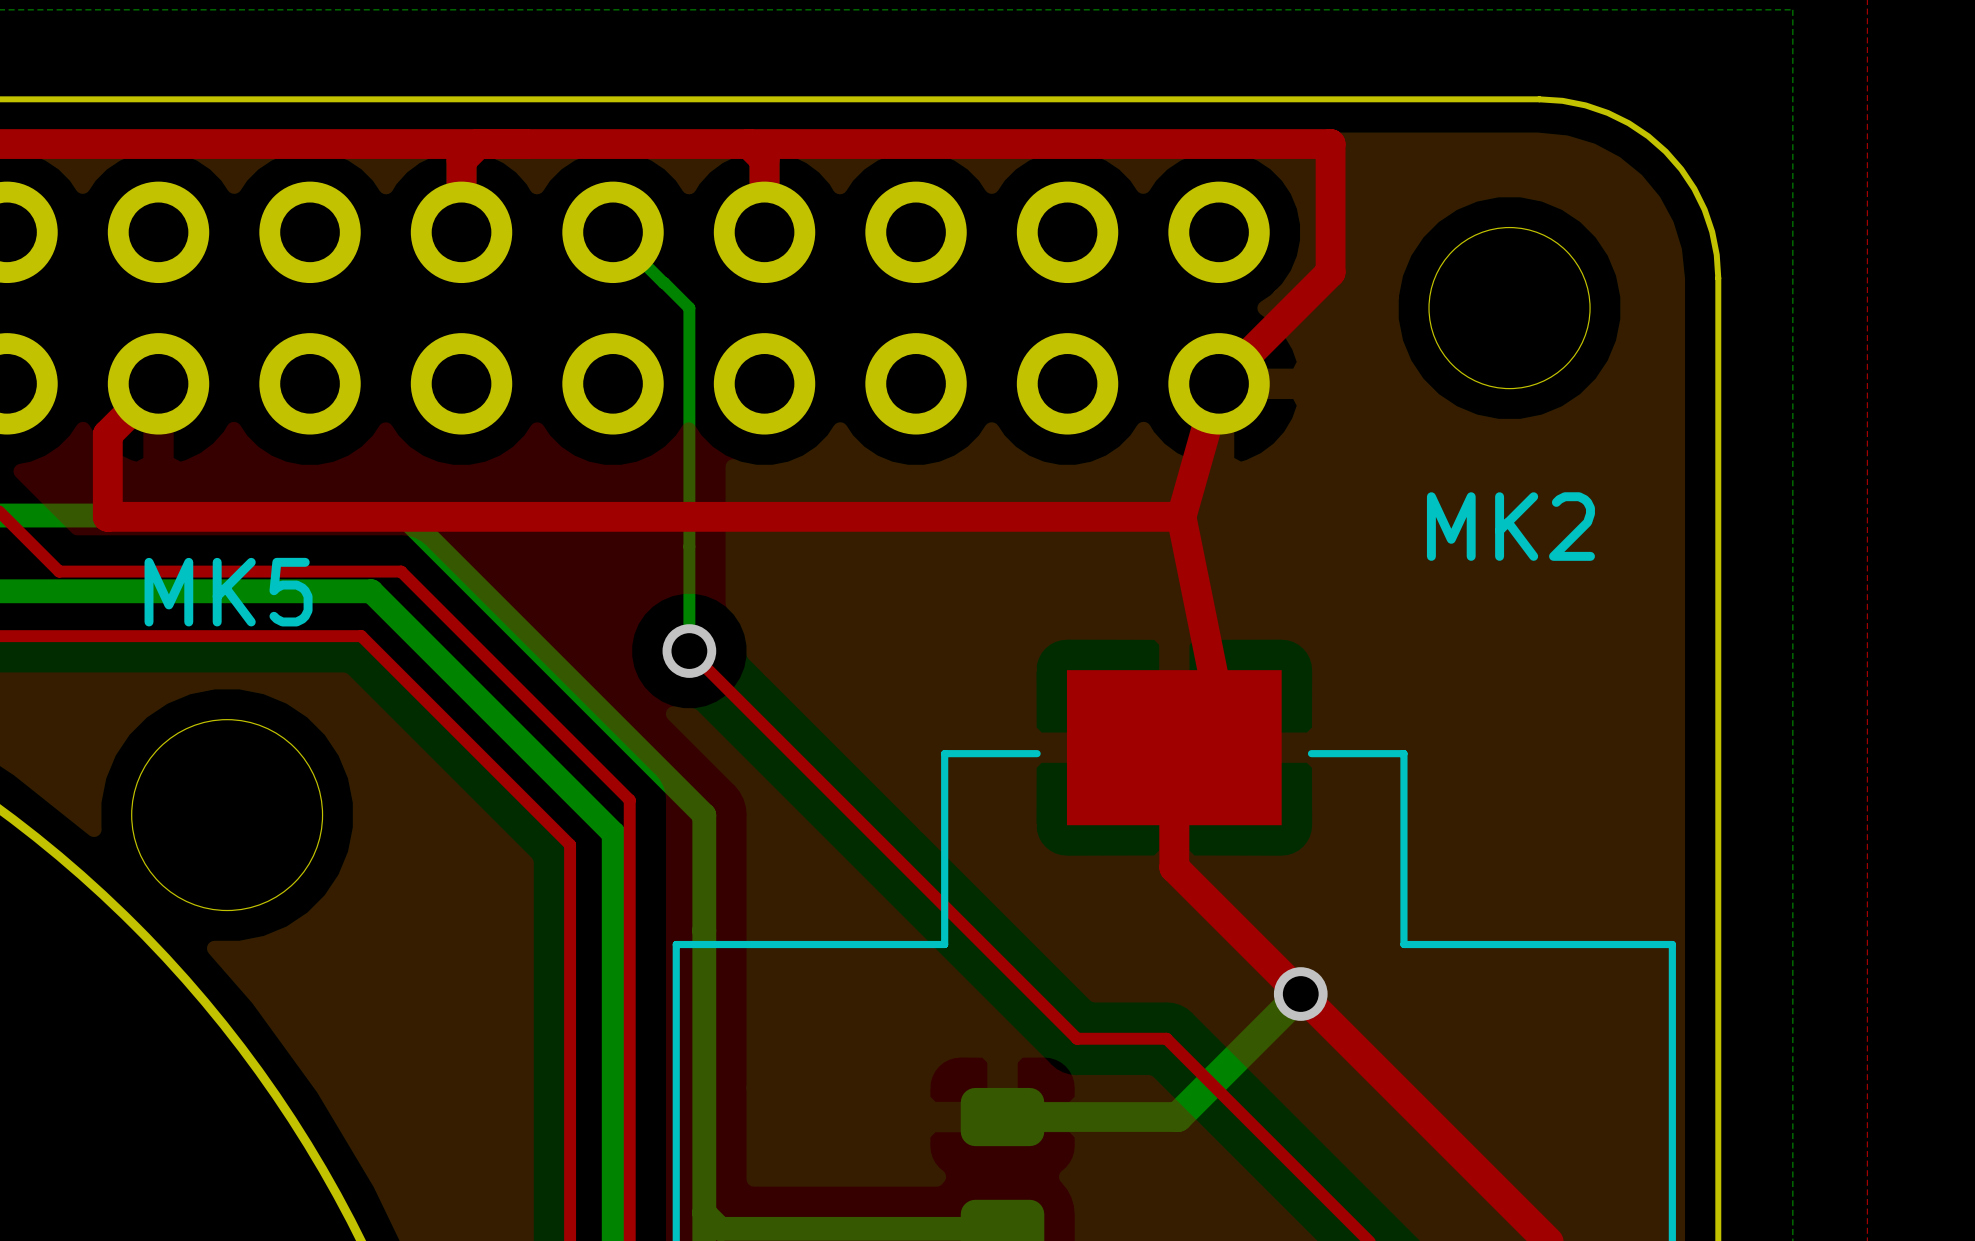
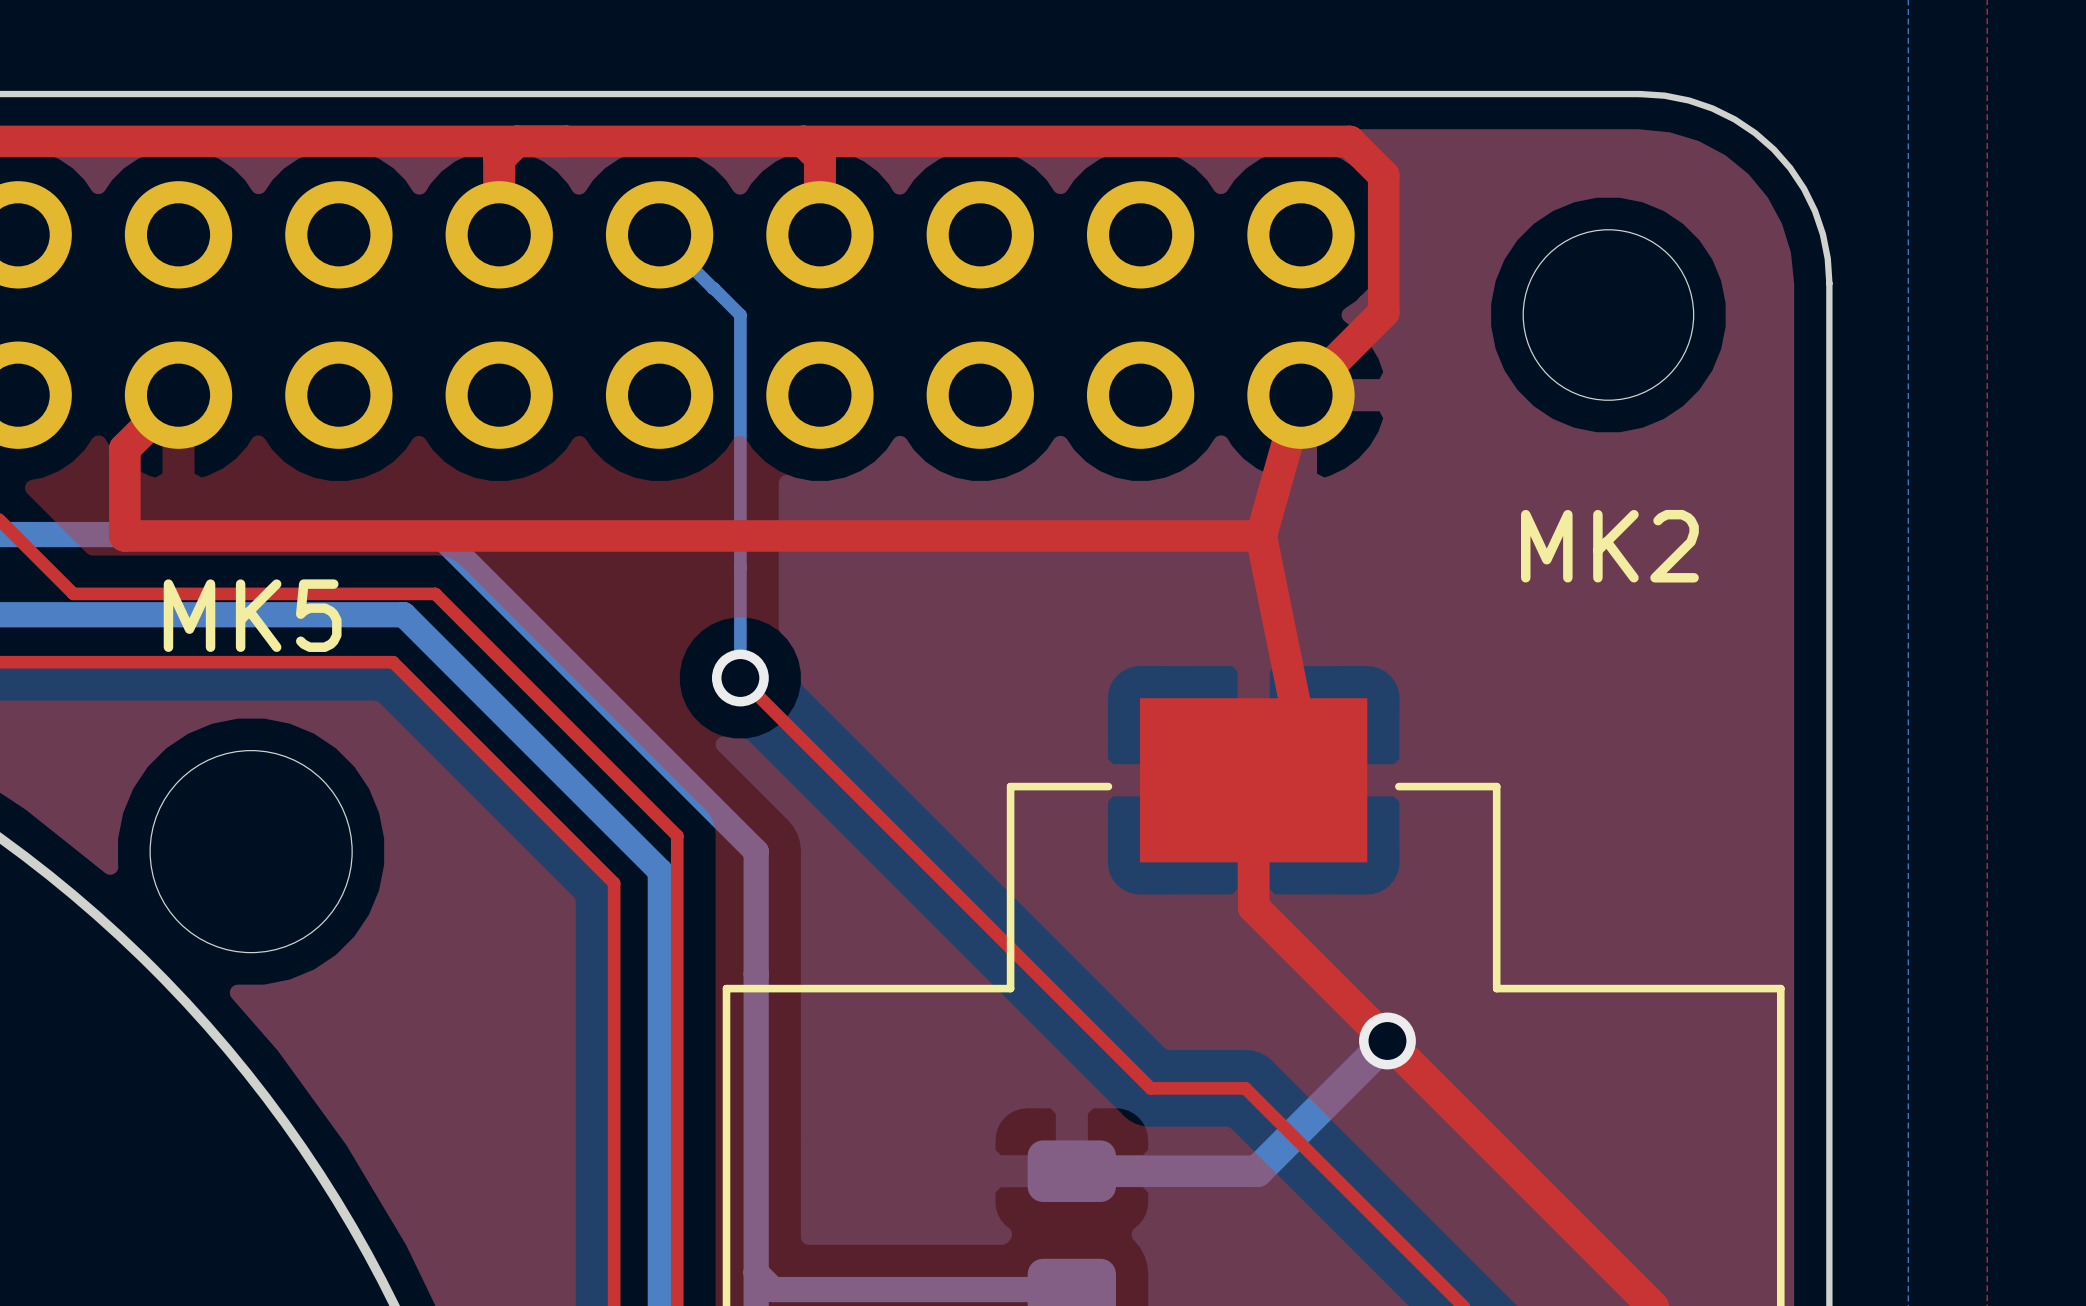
top track: (1264, 144) (1330, 144) (1330, 272) (1297, 305) -> (1349, 141) (1383, 175) (1383, 312)

